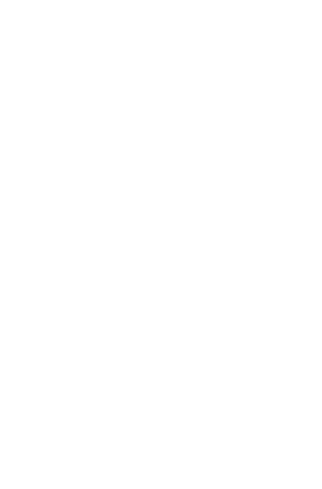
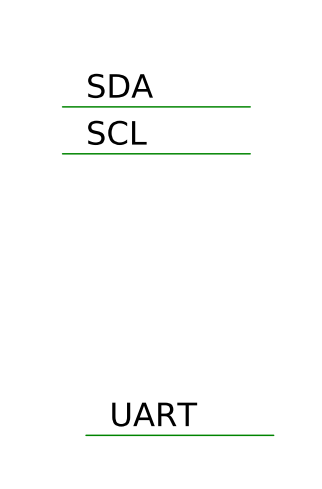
label: none -> SDA (120, 85)
wire: none -> (62, 106) (250, 106)
label: none -> SCL (117, 132)
wire: none -> (62, 153) (250, 153)
label: none -> UART (154, 414)
wire: none -> (86, 435) (273, 435)

